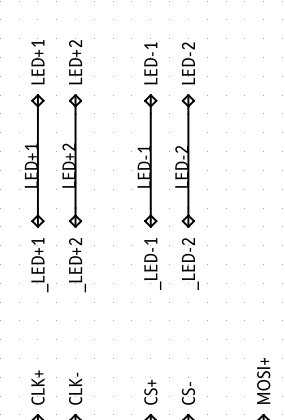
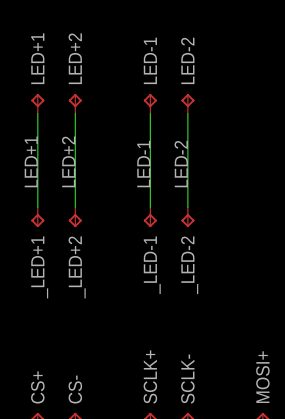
CLK+ name: CLK+ (37, 387) -> CS+ (37, 387)
CLK- name: CLK- (75, 388) -> CS- (75, 389)
CS+ name: CS+ (150, 392) -> SCLK+ (150, 376)
CS- name: CS- (188, 393) -> SCLK- (187, 379)

